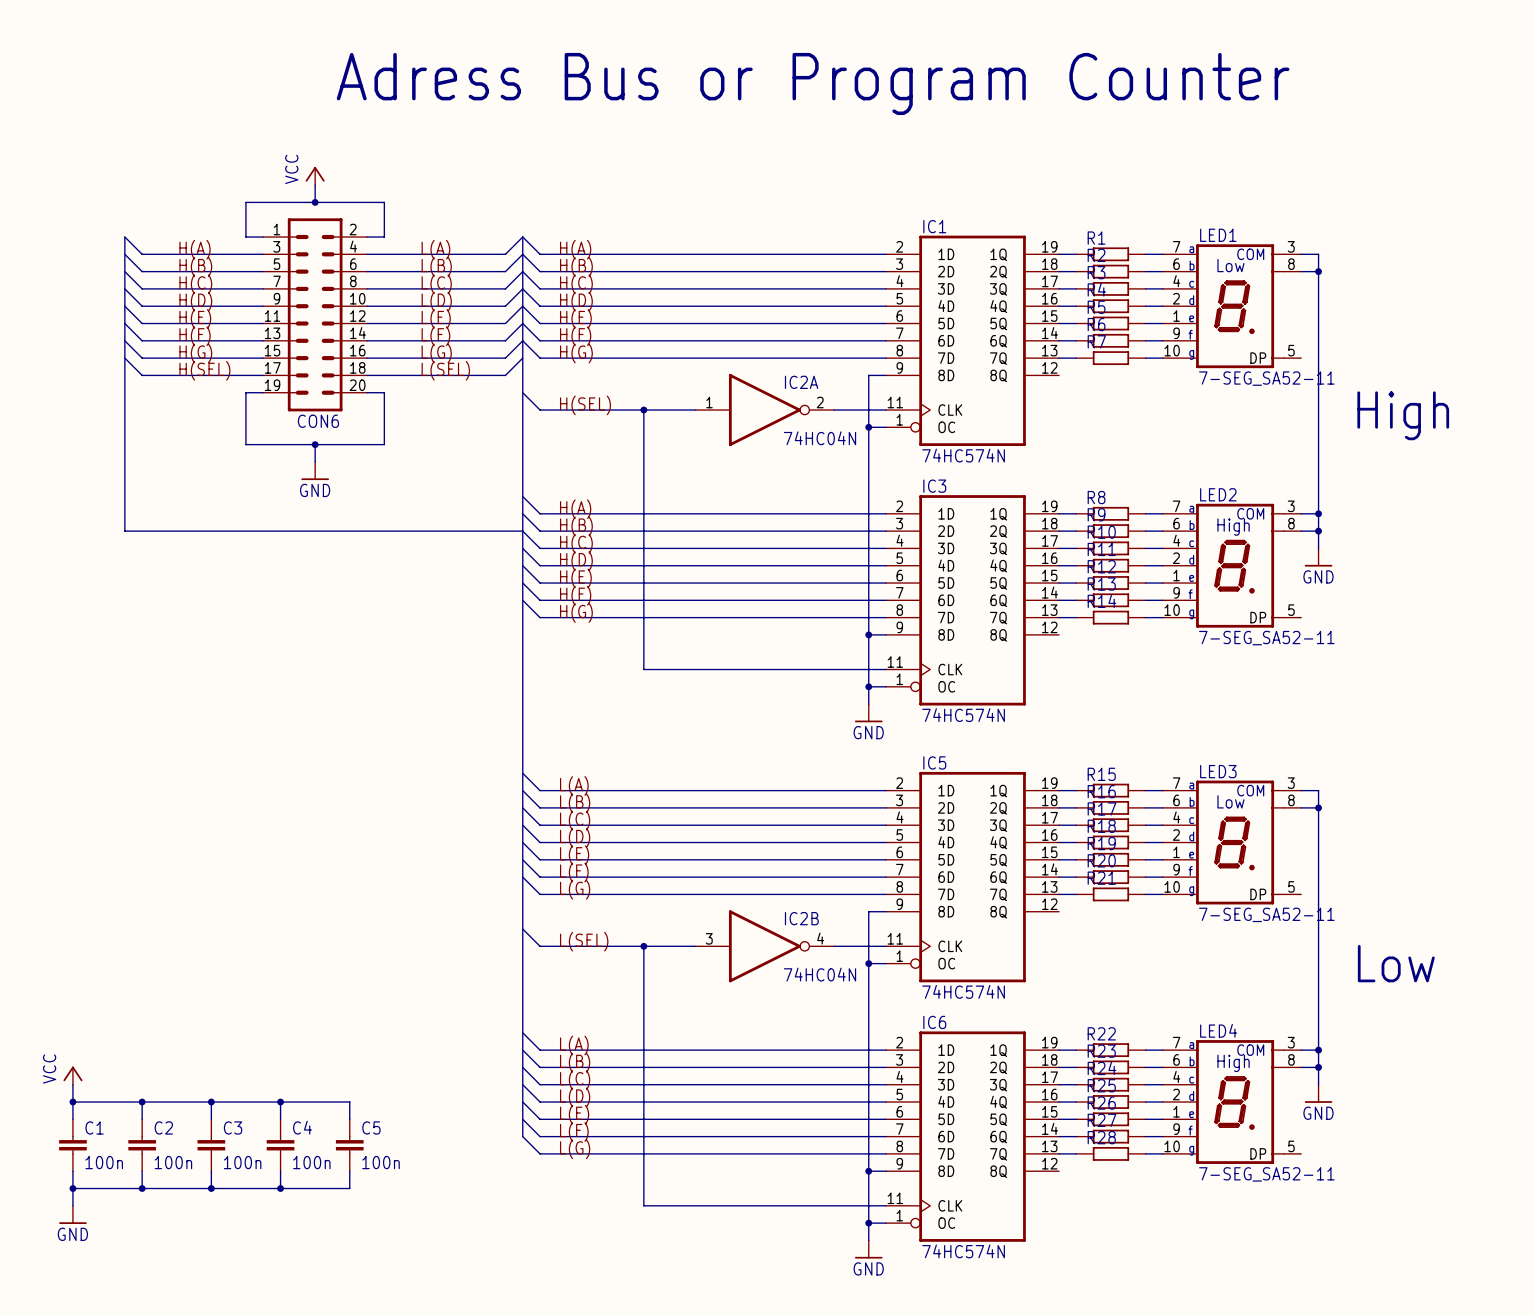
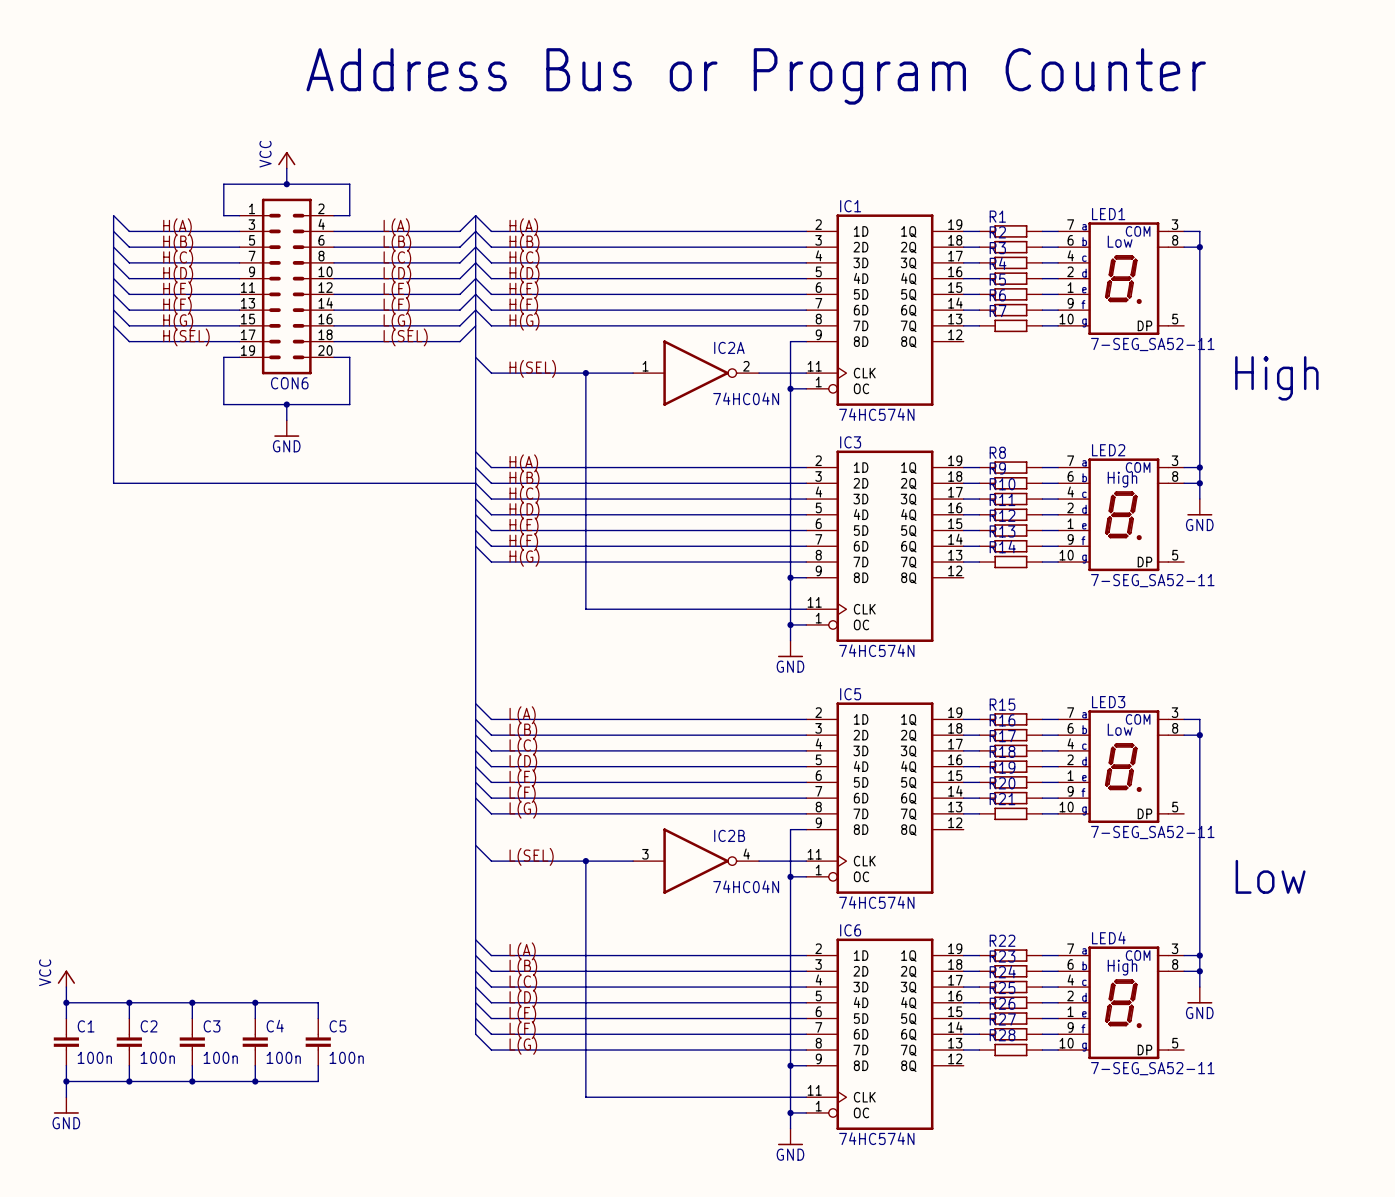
text: Adress Bus or Program Counter (813, 83) -> Address Bus or Program Counter (756, 76)

